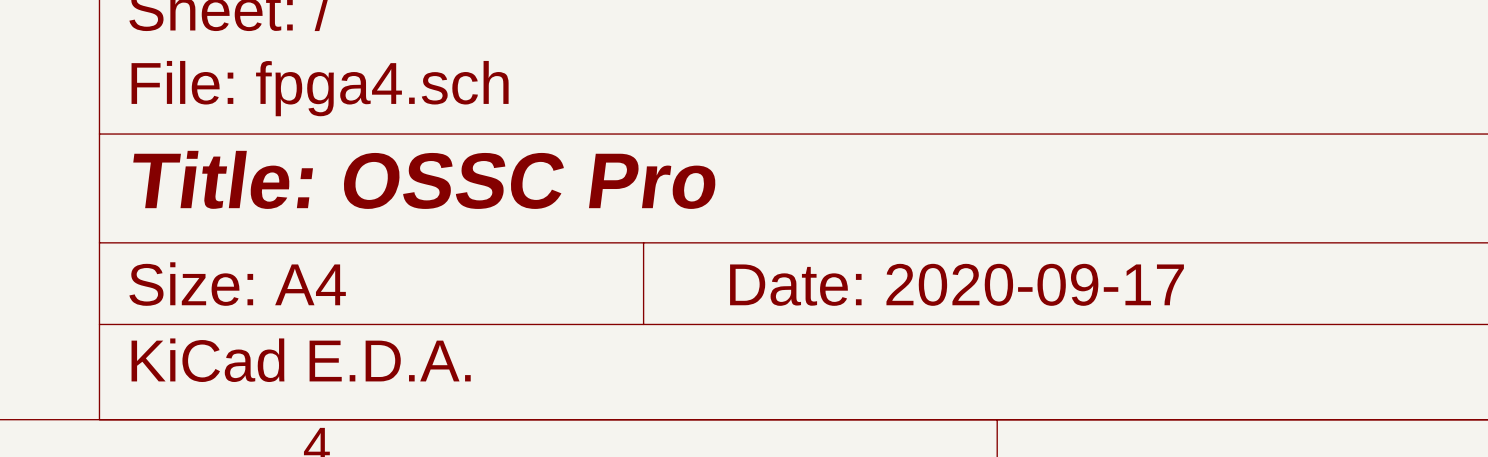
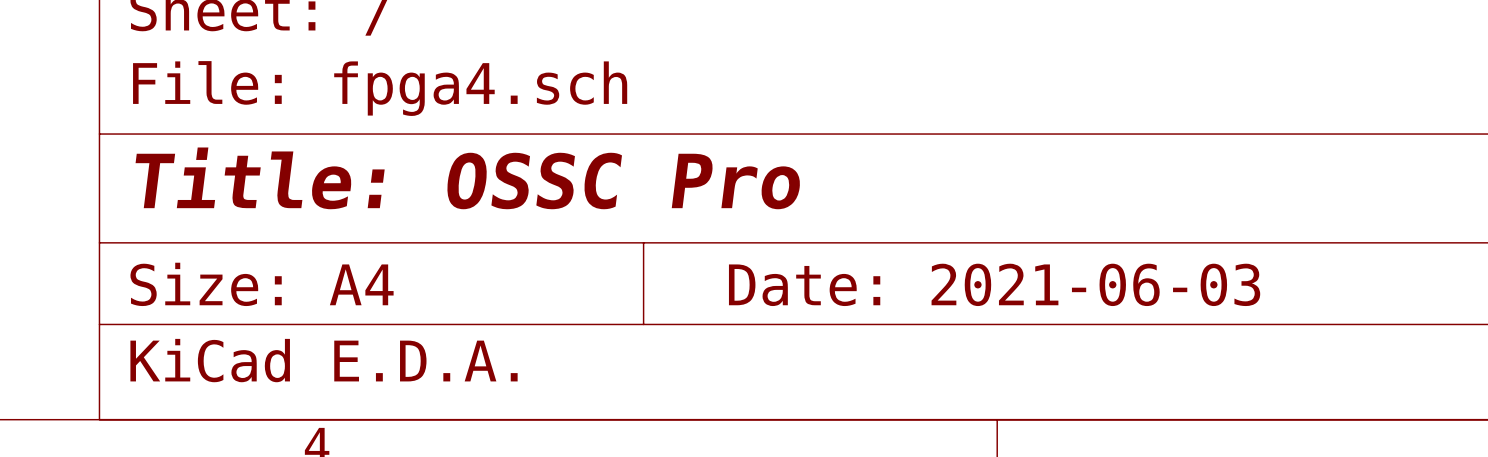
title block: Date: 2020-09-17 (956, 284) -> Date: 2021-06-03 (994, 284)

